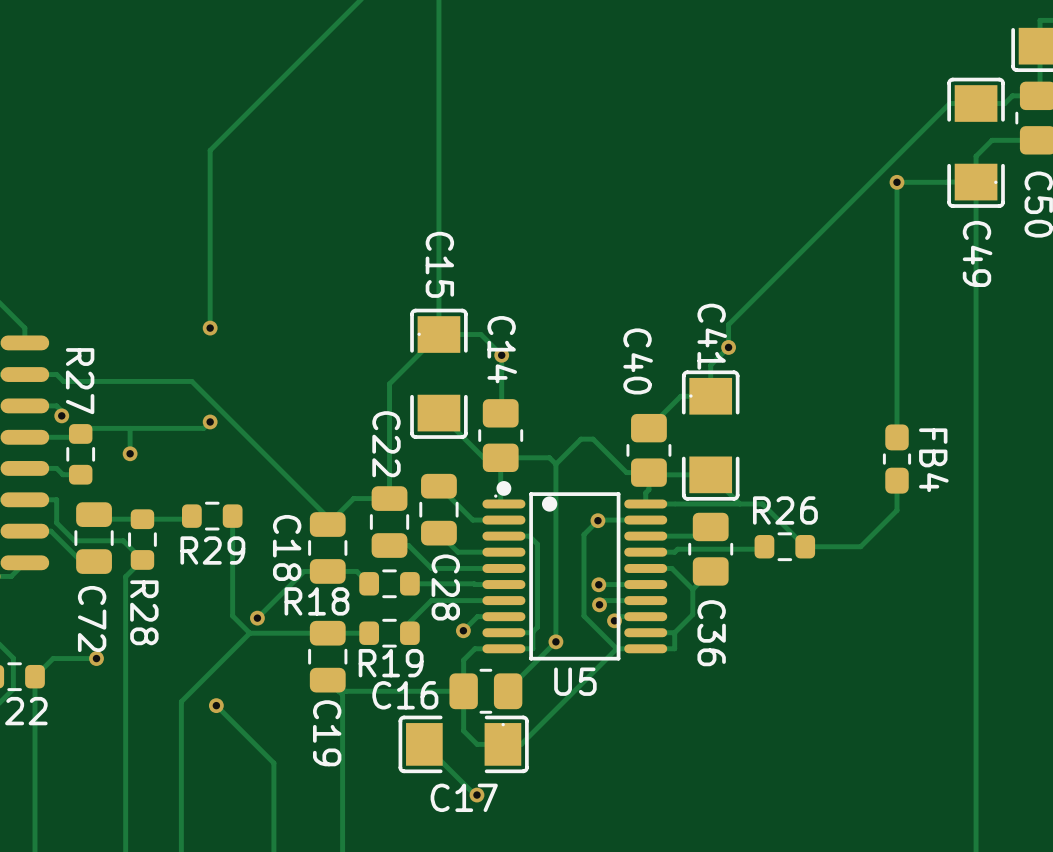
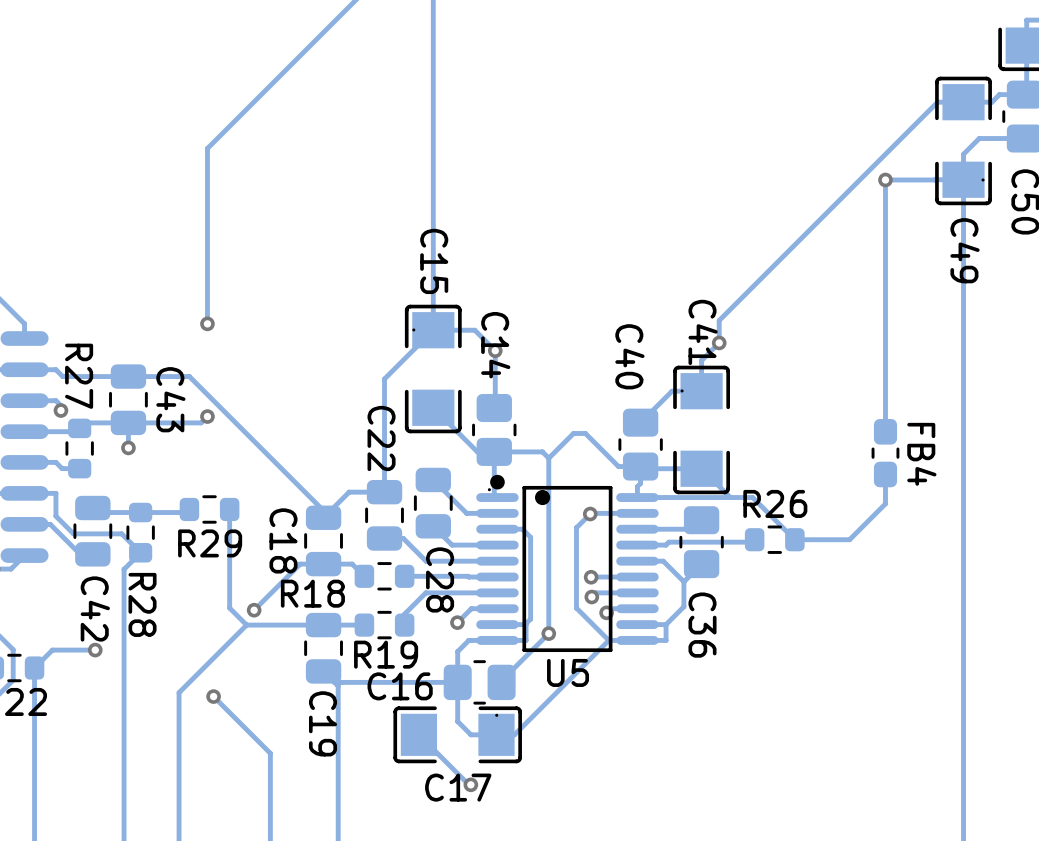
C43: none -> (128, 399)
C72 name: C72 (92, 619) -> C42 (95, 608)

